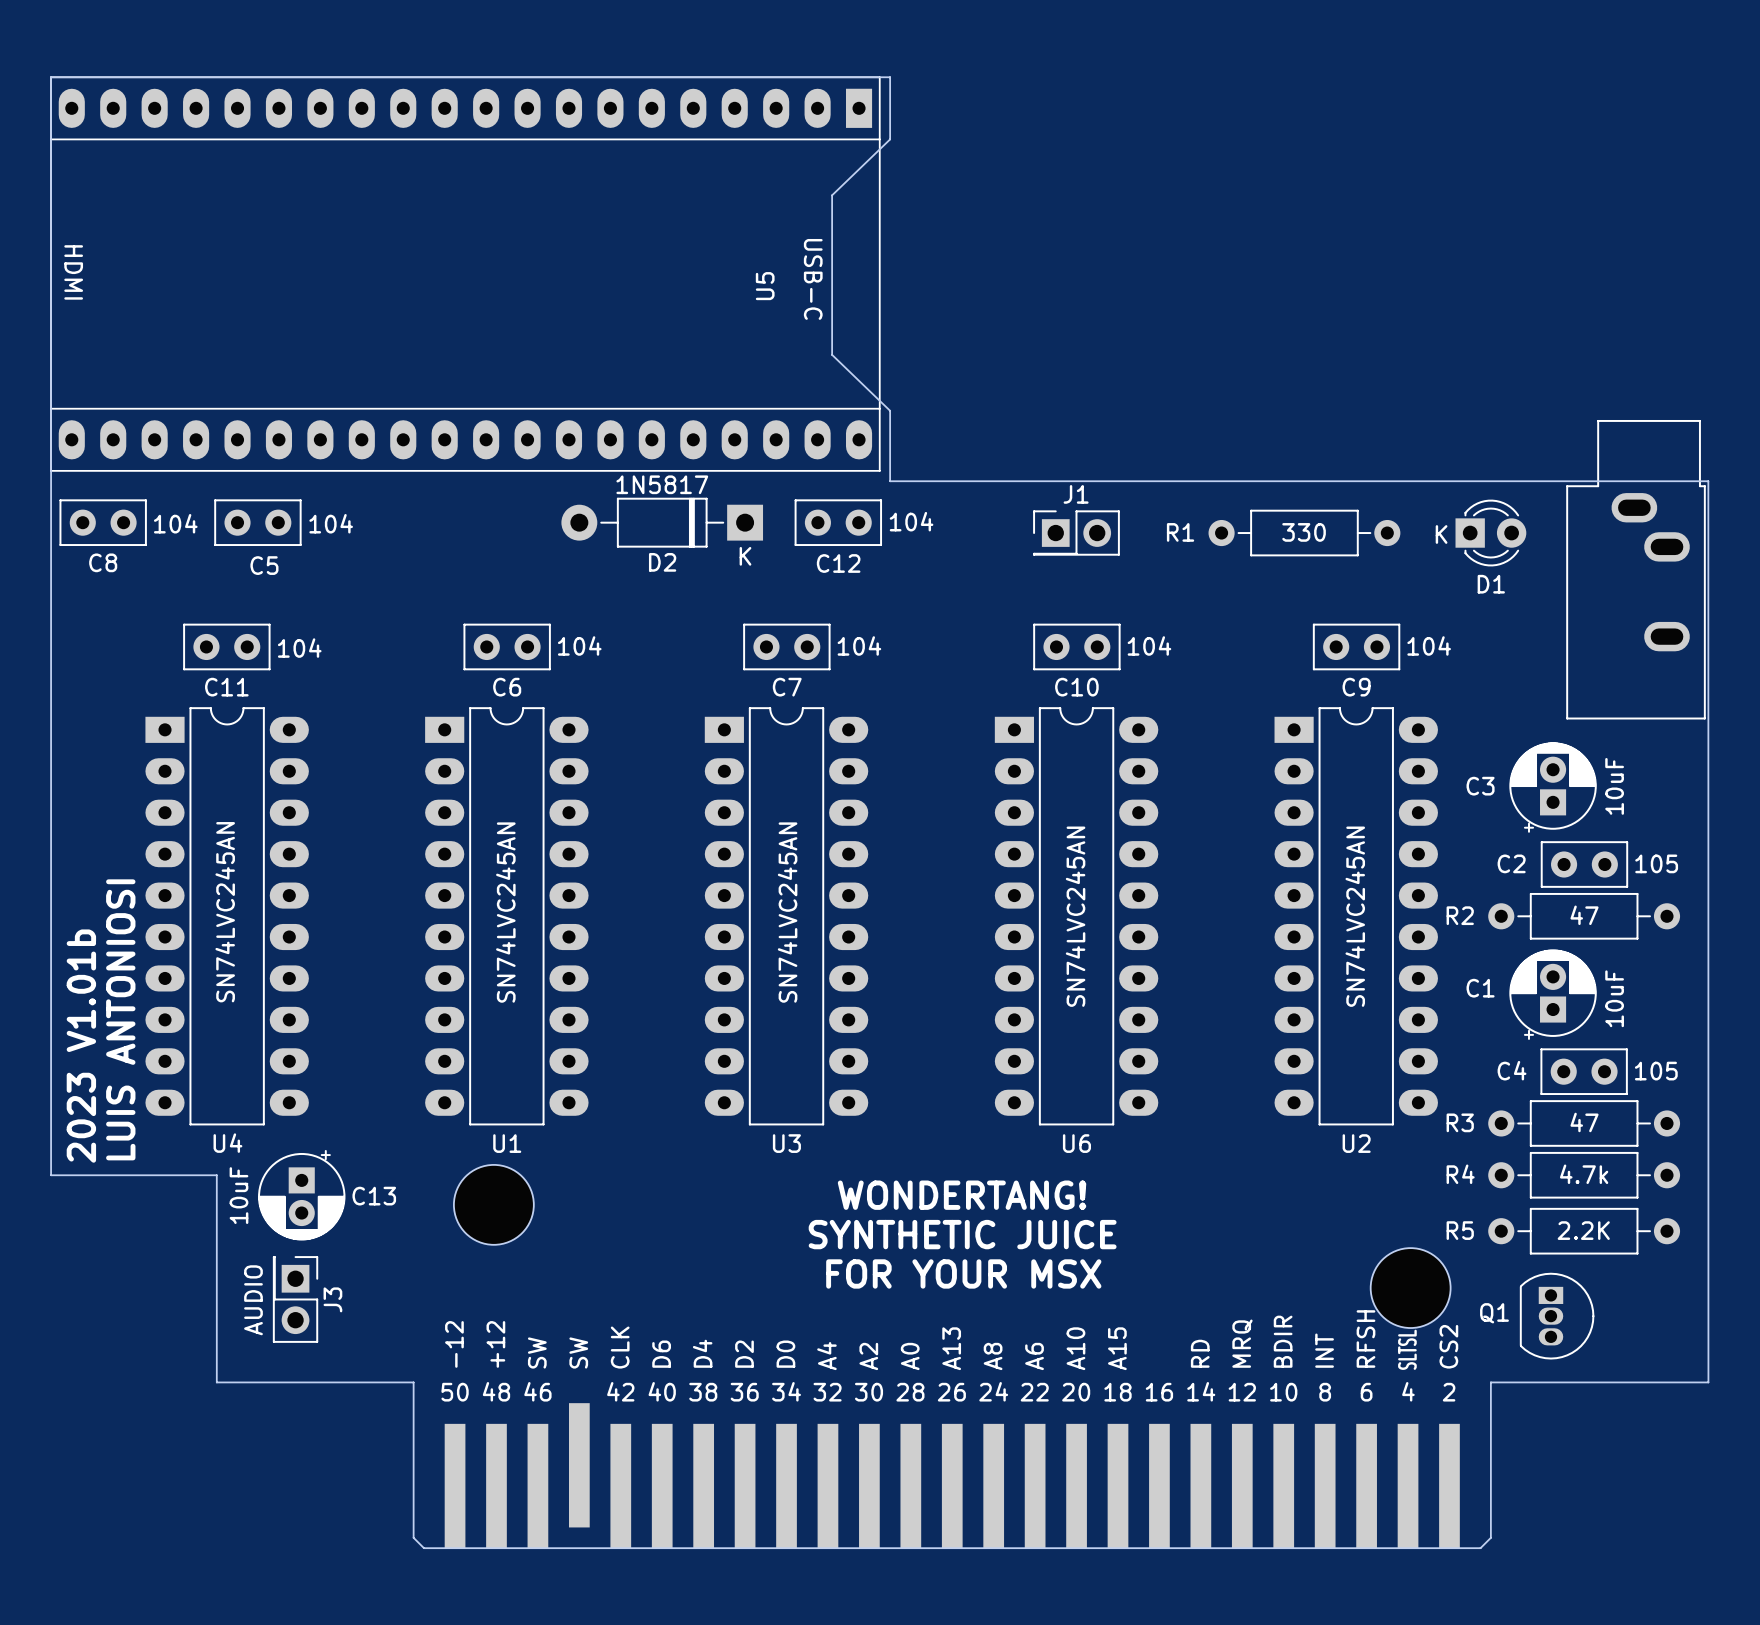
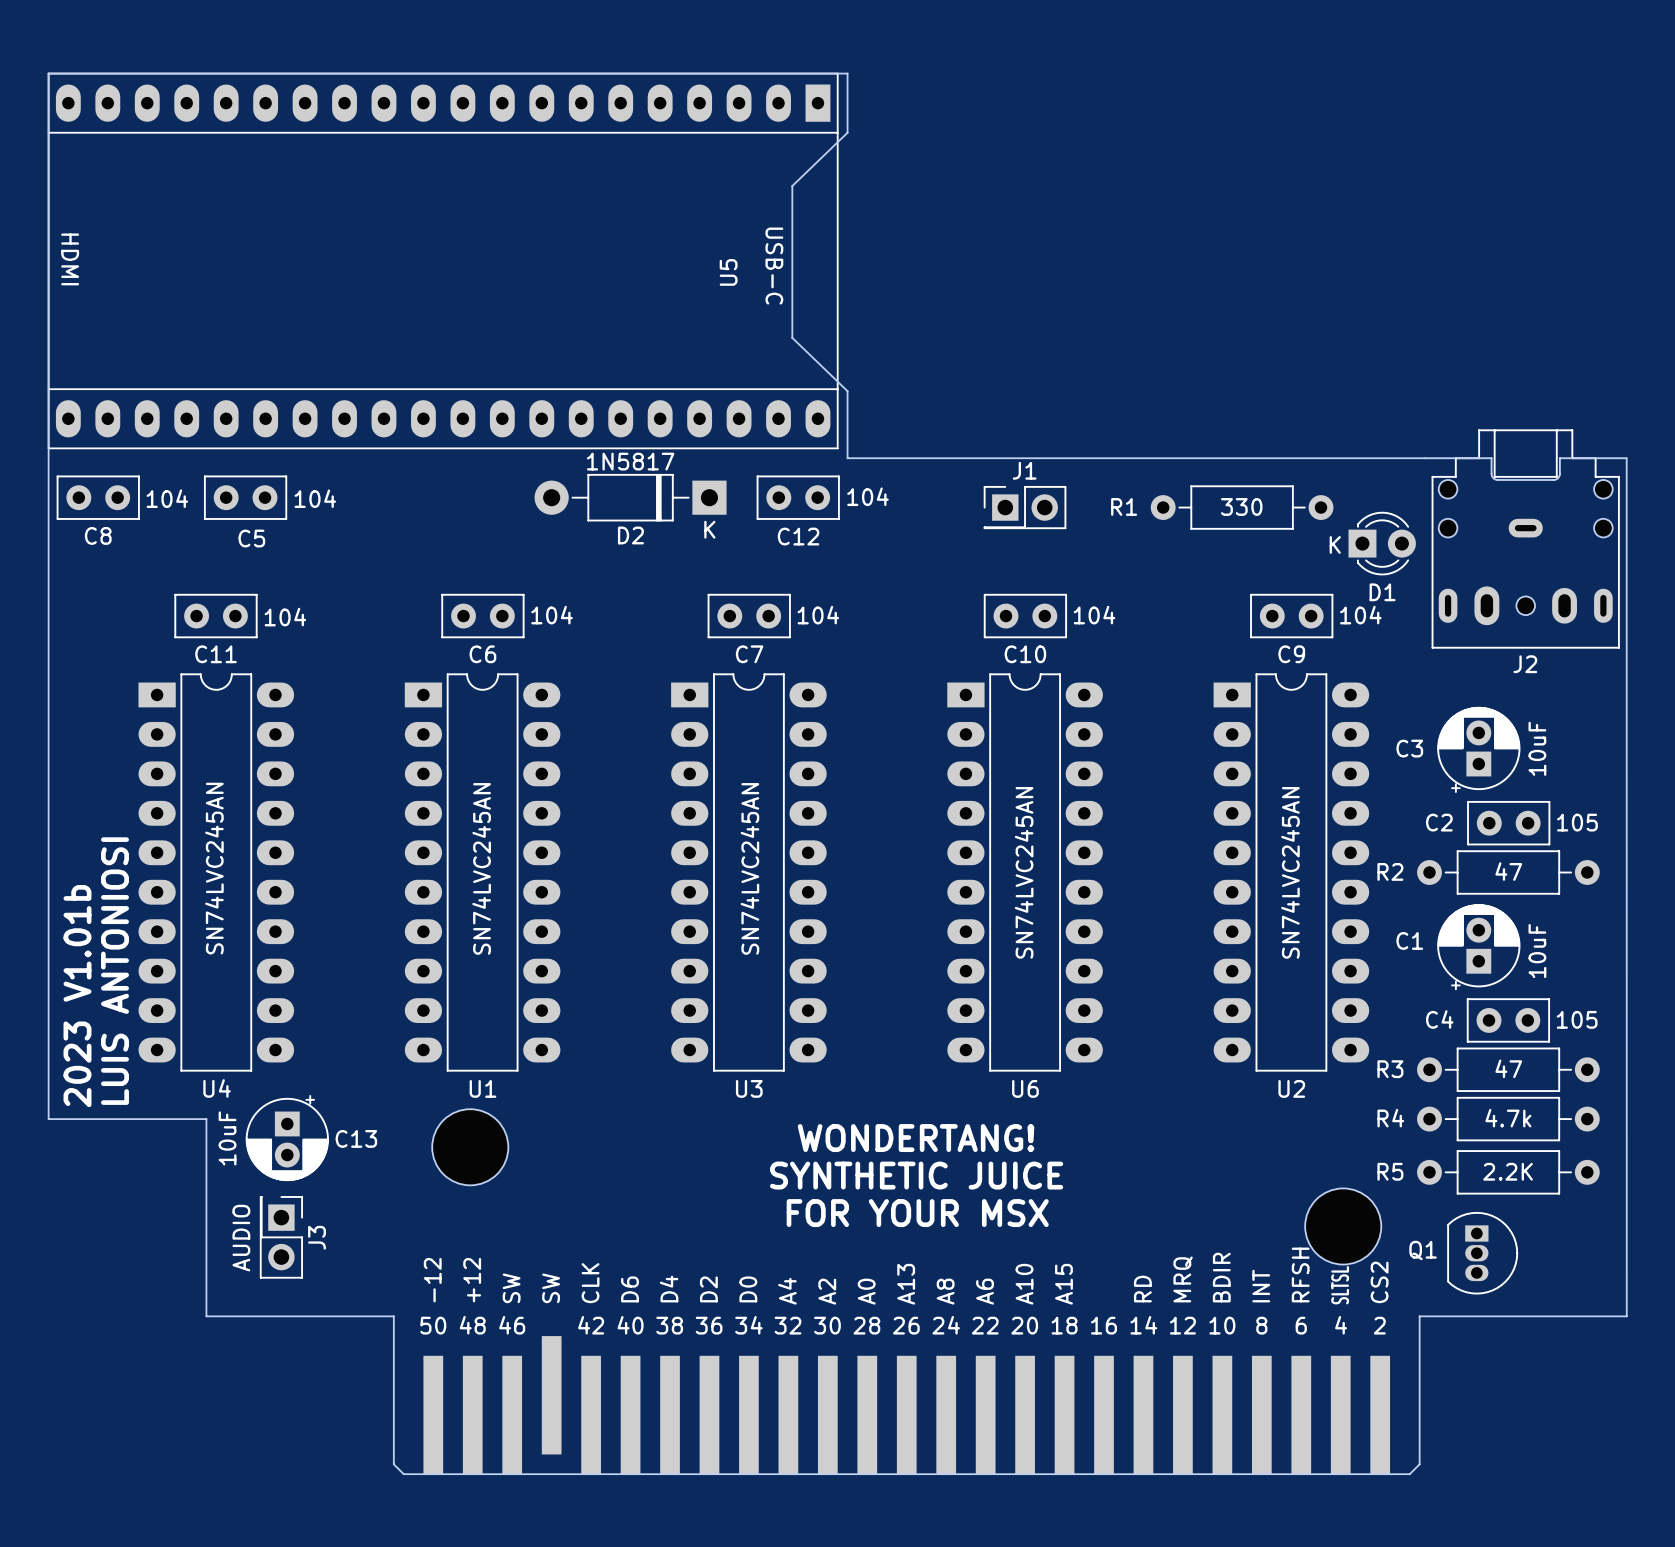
board edge: (1496, 481) (1708, 481) -> none
D1 position: (1490, 533) -> (1382, 543)
J2: none -> (1525, 539)
part: (1636, 569) -> none

